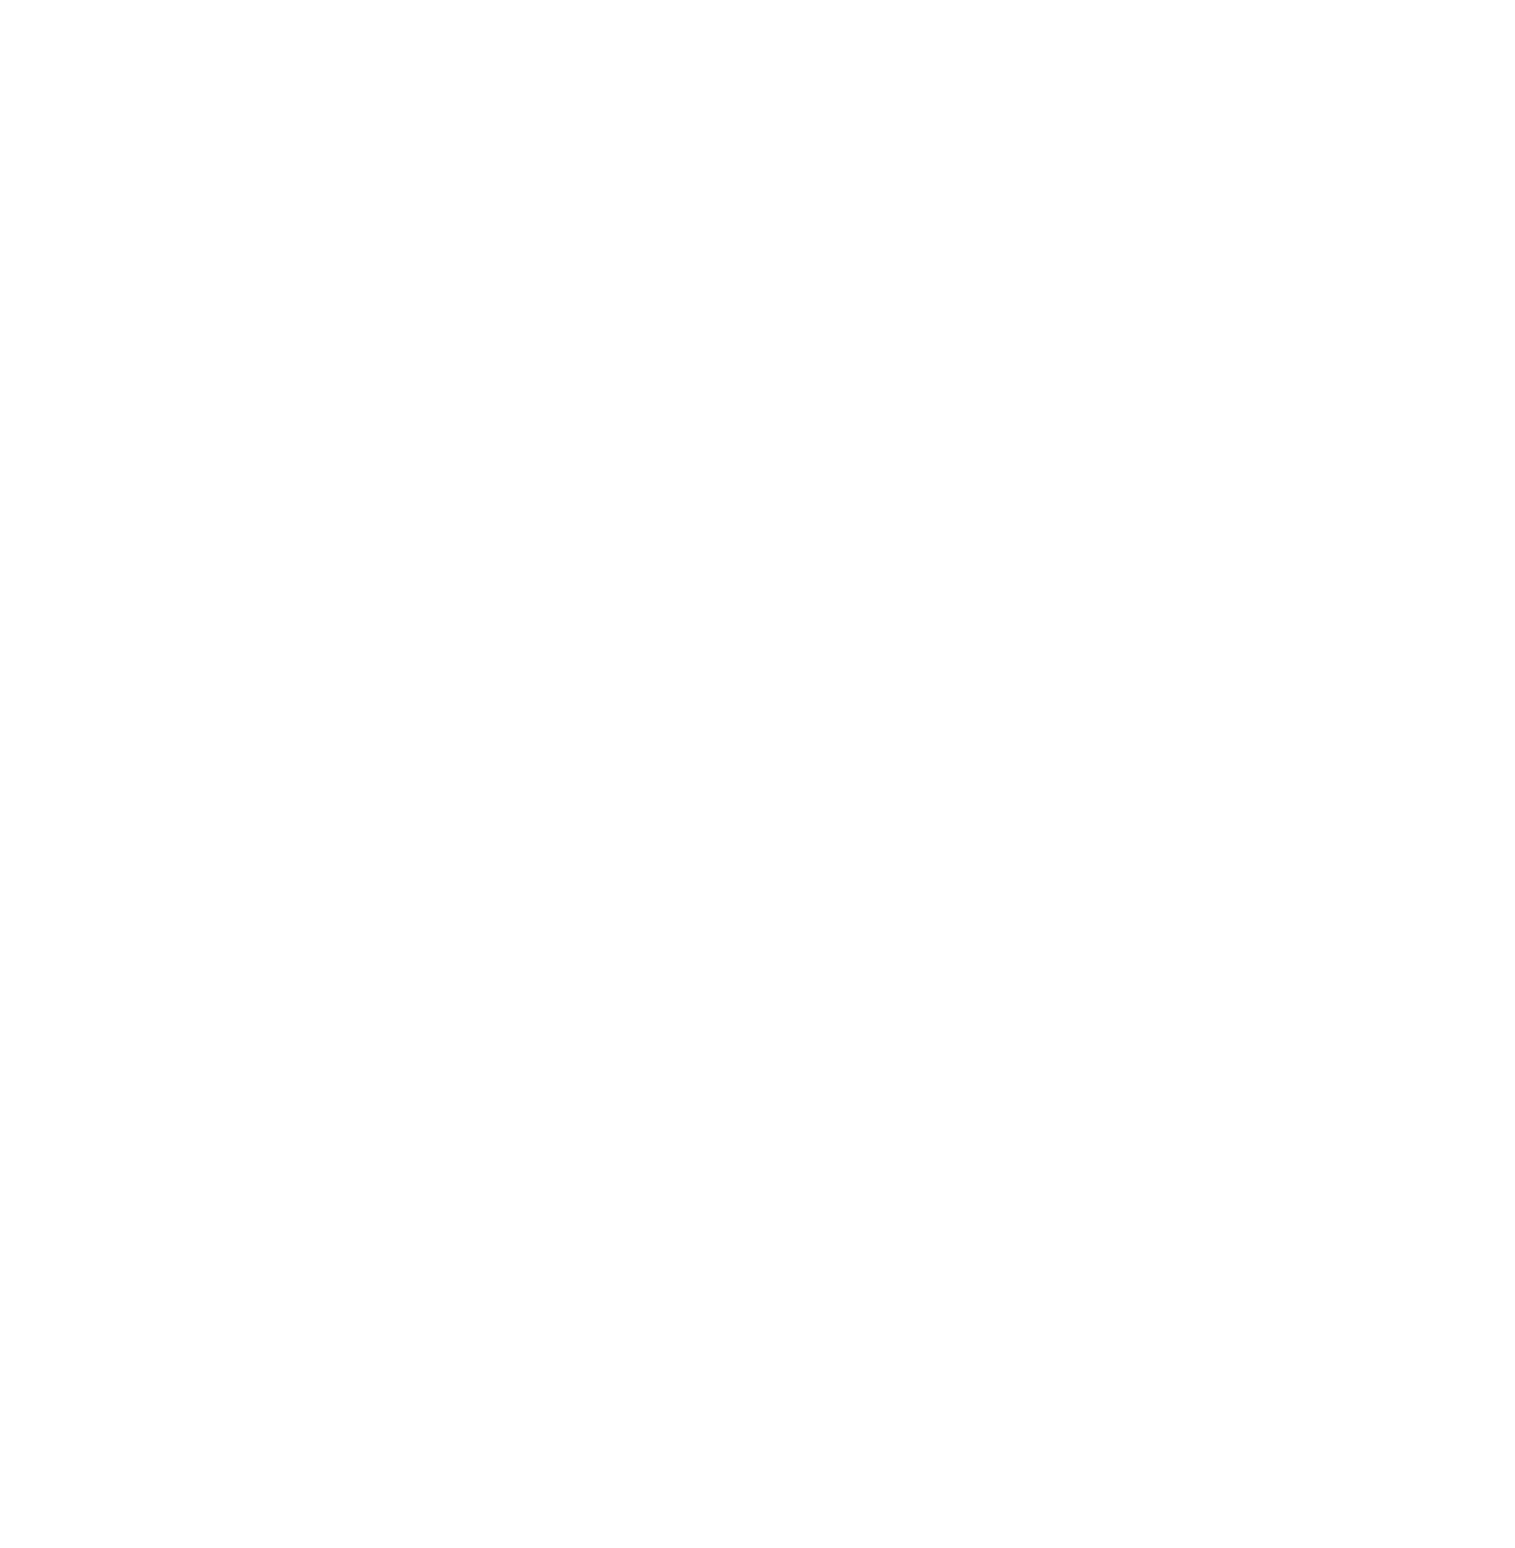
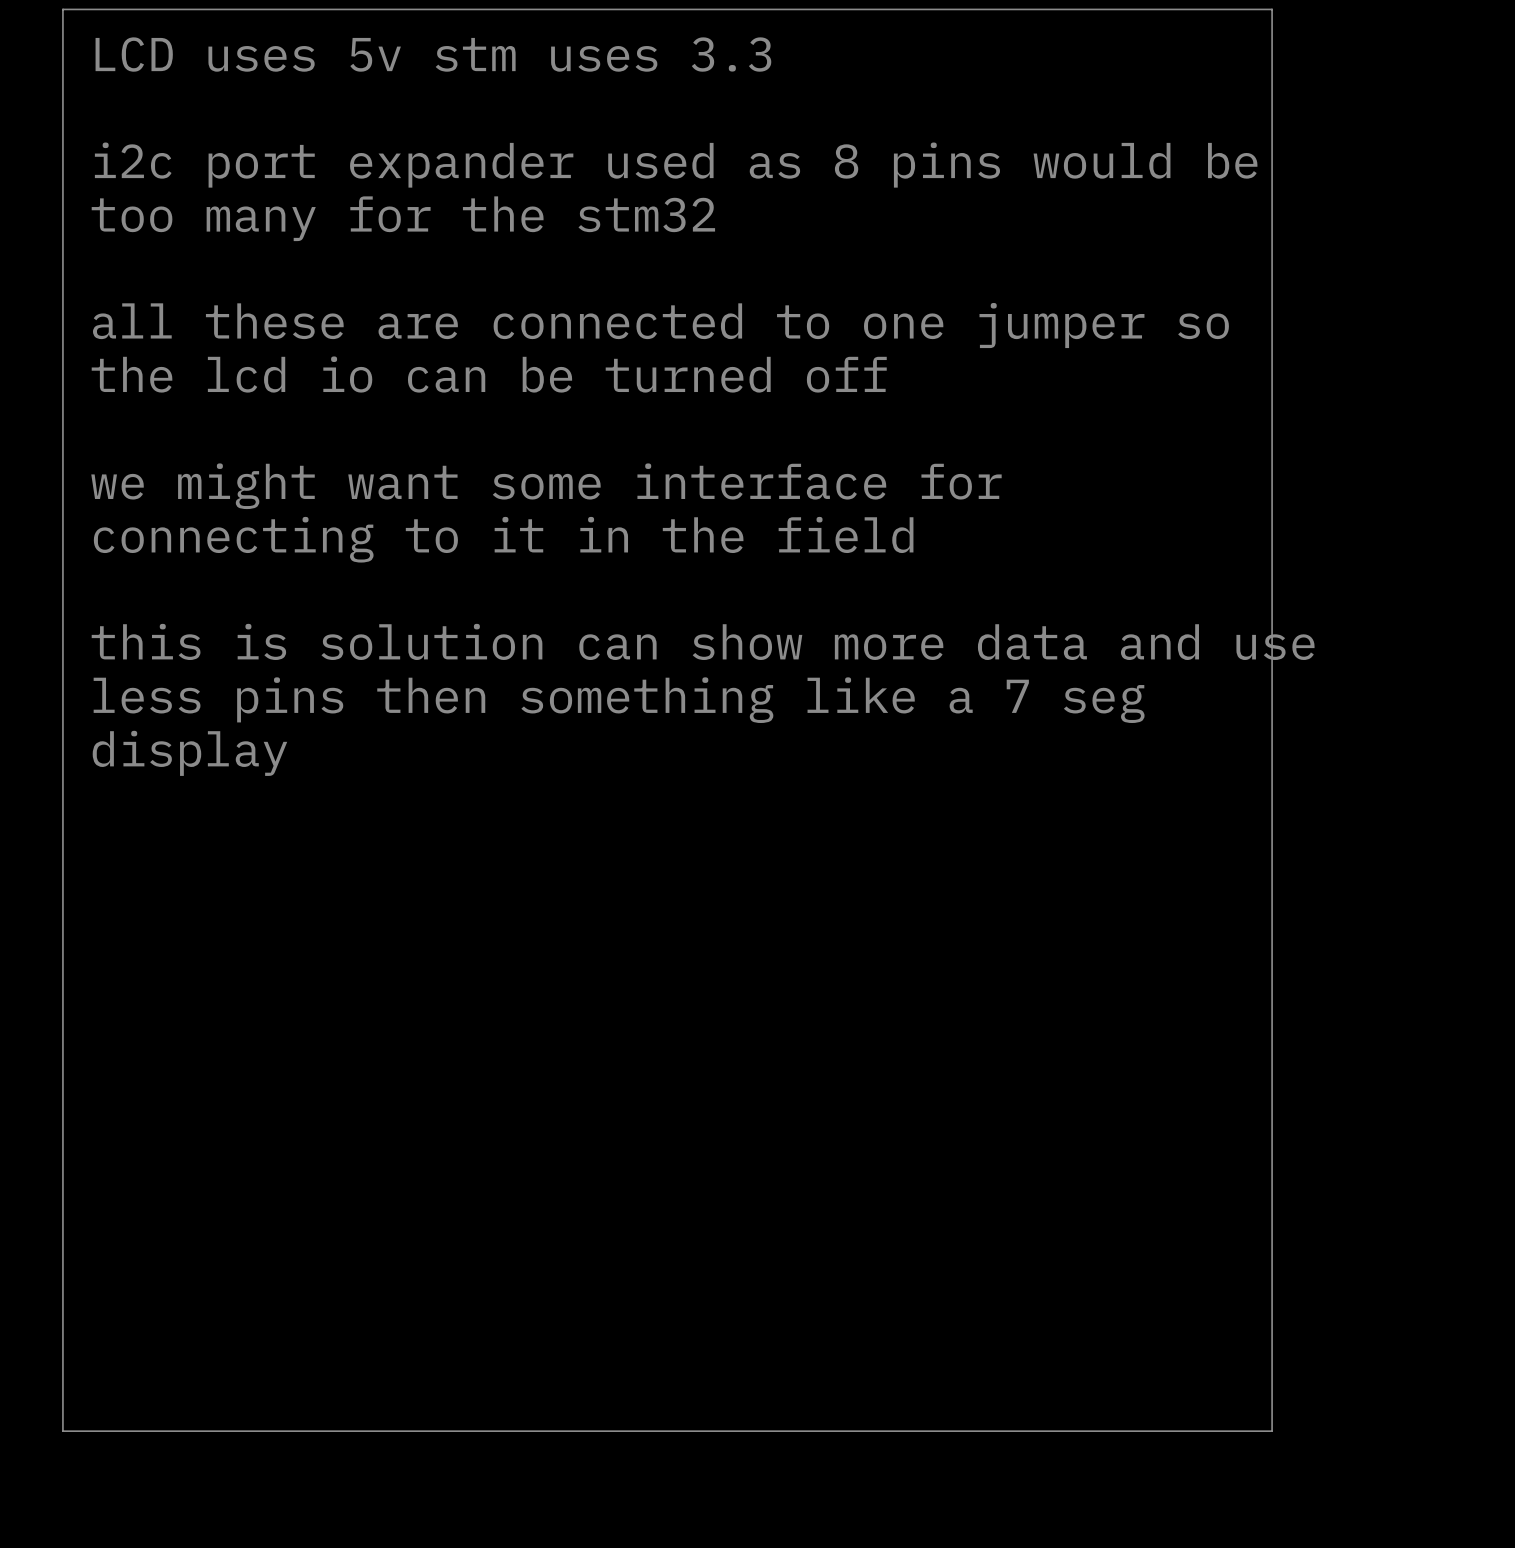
line: none -> (62, 9) (1272, 9) (1272, 1431) (62, 1431) (62, 9)
text: none -> LCD uses 5v stm uses 3.3 (433, 54)
text: none -> i2c port expander used as 8 pins would be (676, 165)
text: none -> too many for the stm32 (403, 218)
text: none -> all these are connected to one jumper so (660, 325)
text: none -> the lcd io can be turned off (489, 374)
text: none -> we might want some interface for (546, 486)
text: none -> connecting to it in the field (503, 539)
text: none -> this is solution can show more data and use (703, 641)
text: none -> less pins then something like a 7 seg (619, 700)
text: none -> display (189, 753)

